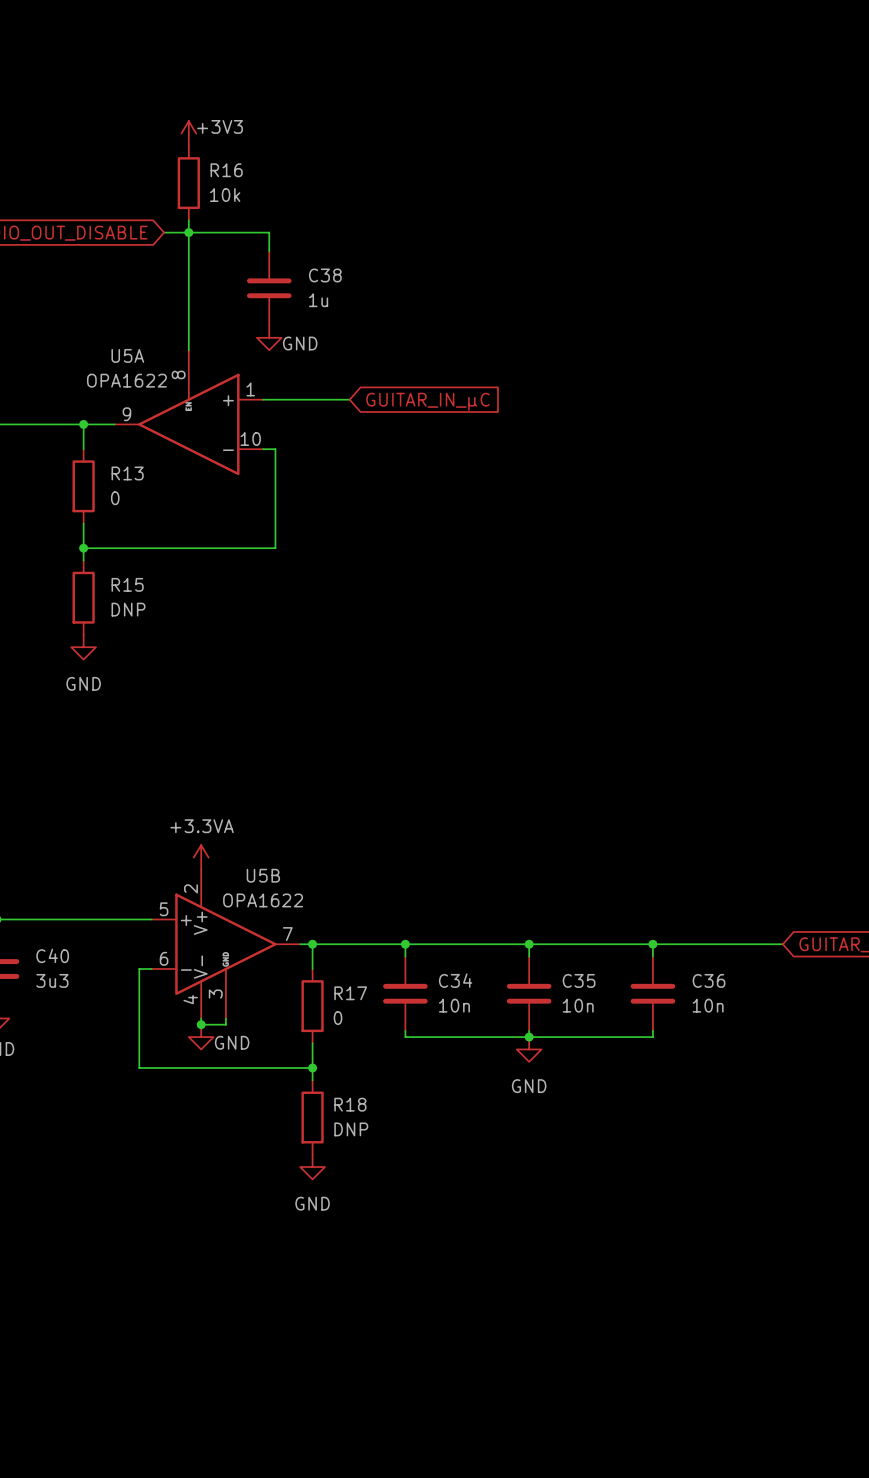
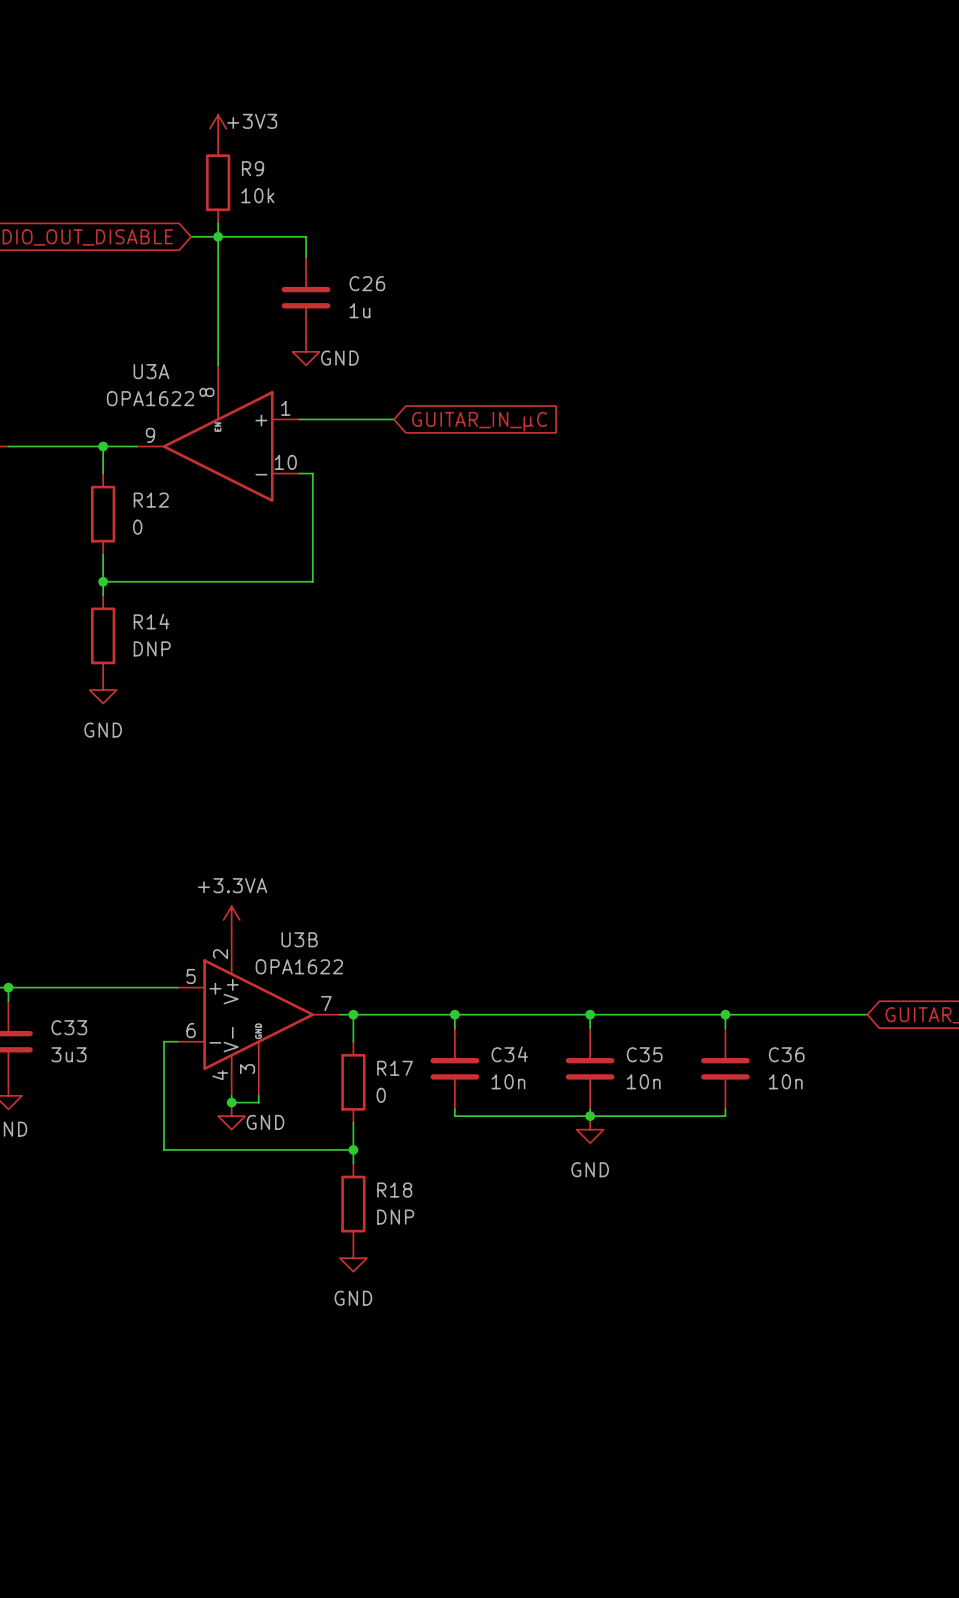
R16 name: R16 (226, 170) -> R9 (253, 168)
C38 name: C38 (325, 275) -> C26 (367, 283)
U5A name: U5A (127, 355) -> U3A (151, 371)
R13 name: R13 (127, 473) -> R12 (151, 500)
R15 name: R15 (127, 584) -> R14 (151, 621)
U5B name: U5B (263, 875) -> U3B (299, 939)
C40 name: C40 (52, 955) -> C33 (69, 1027)

